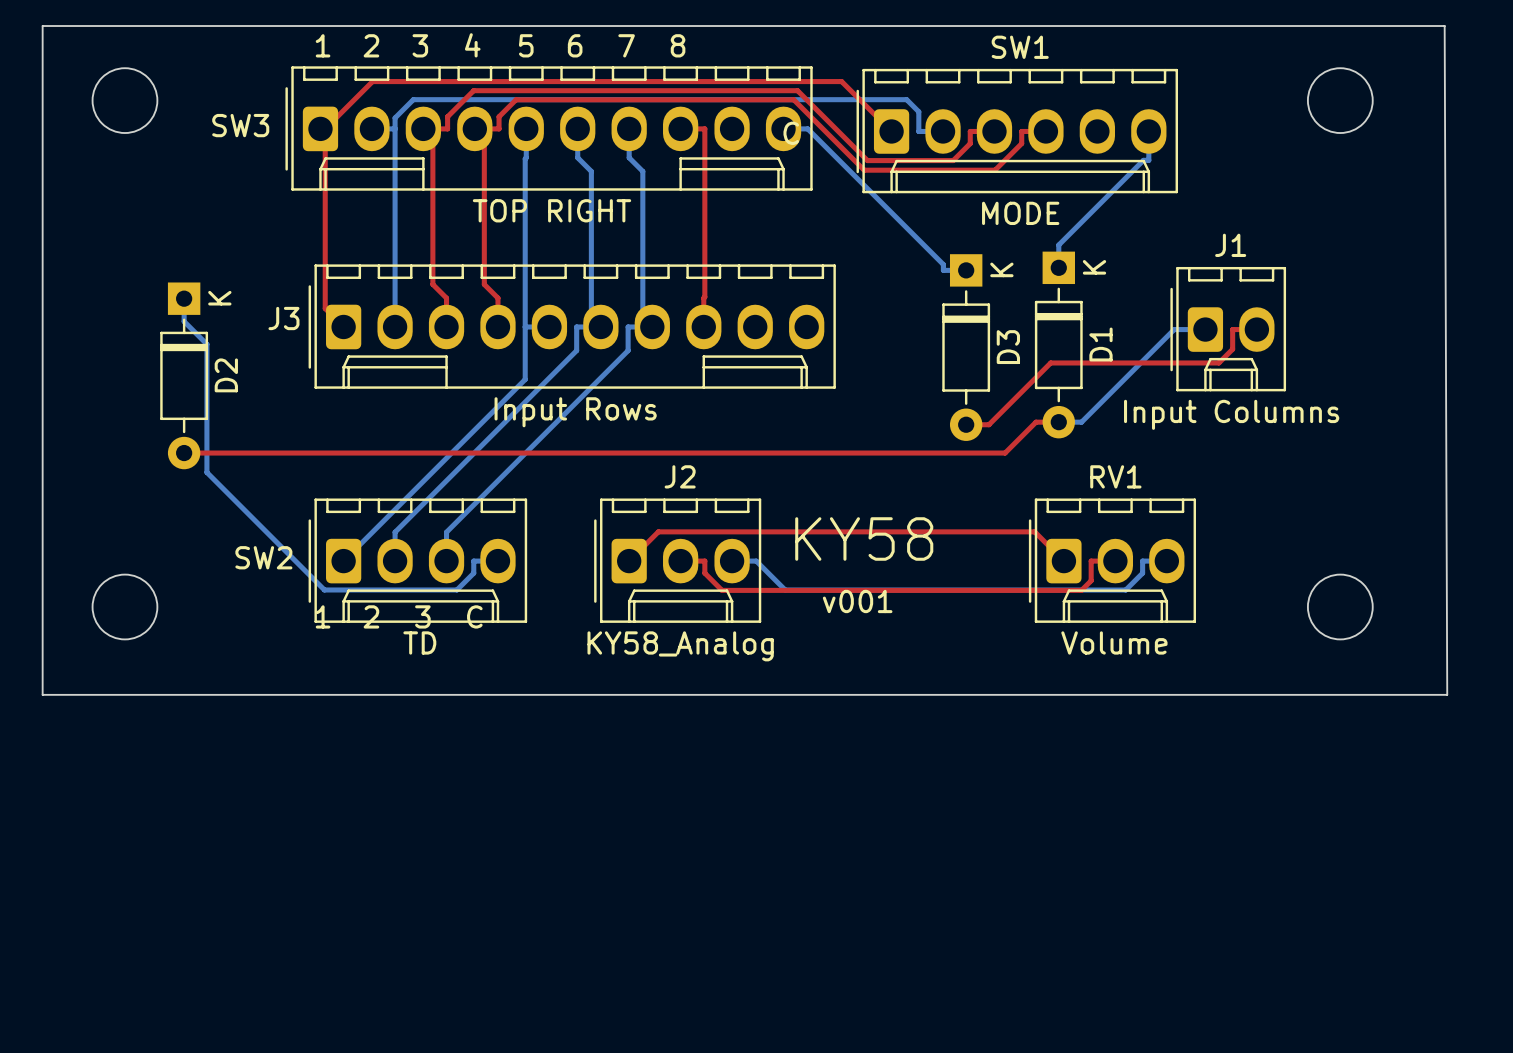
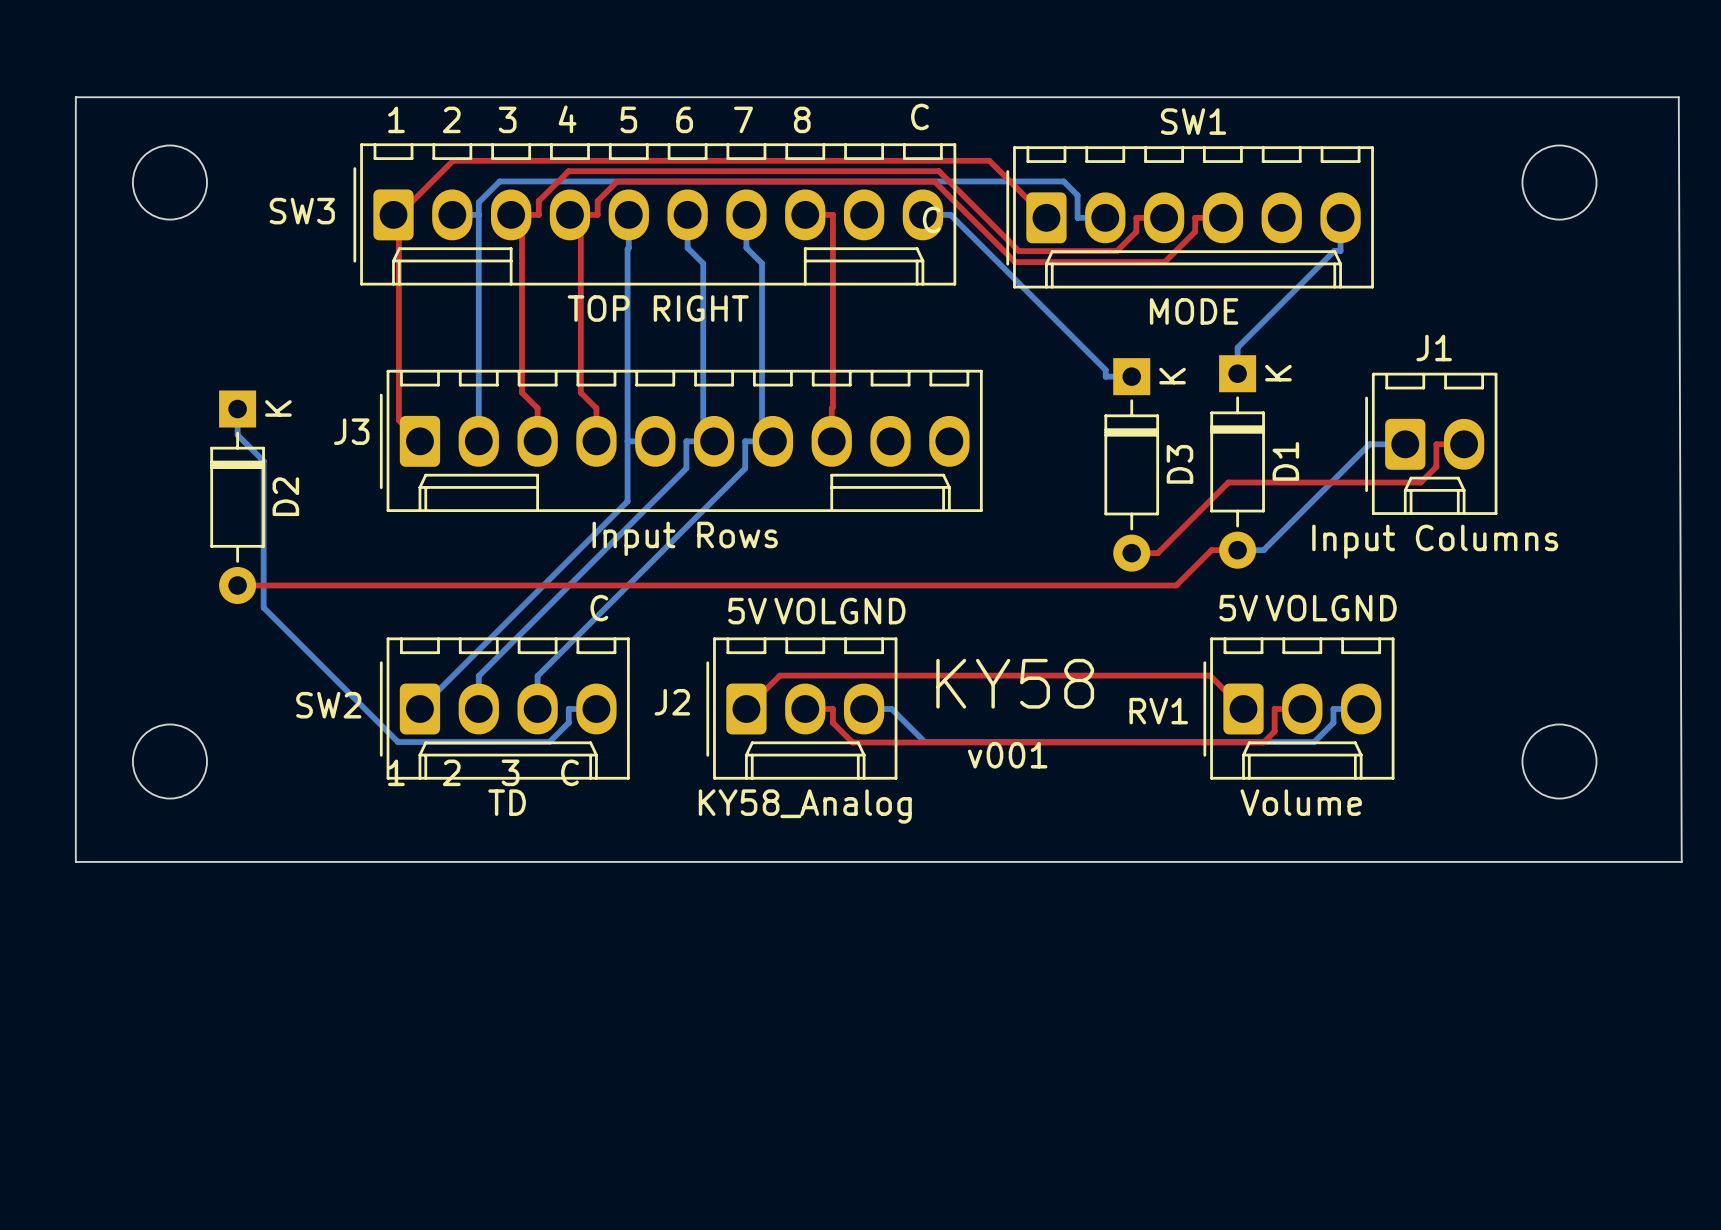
text: none -> C (919, 116)
text: none -> C (599, 608)
text: none -> 5V (1238, 608)
text: none -> VOL (1296, 608)
text: none -> GND (1364, 608)
text: none -> 5V (747, 611)
text: none -> VOL (805, 611)
text: none -> GND (872, 611)
J2 name position: J2 (680, 476) -> J2 (672, 702)
RV1 name position: RV1 (1115, 476) -> RV1 (1158, 711)

